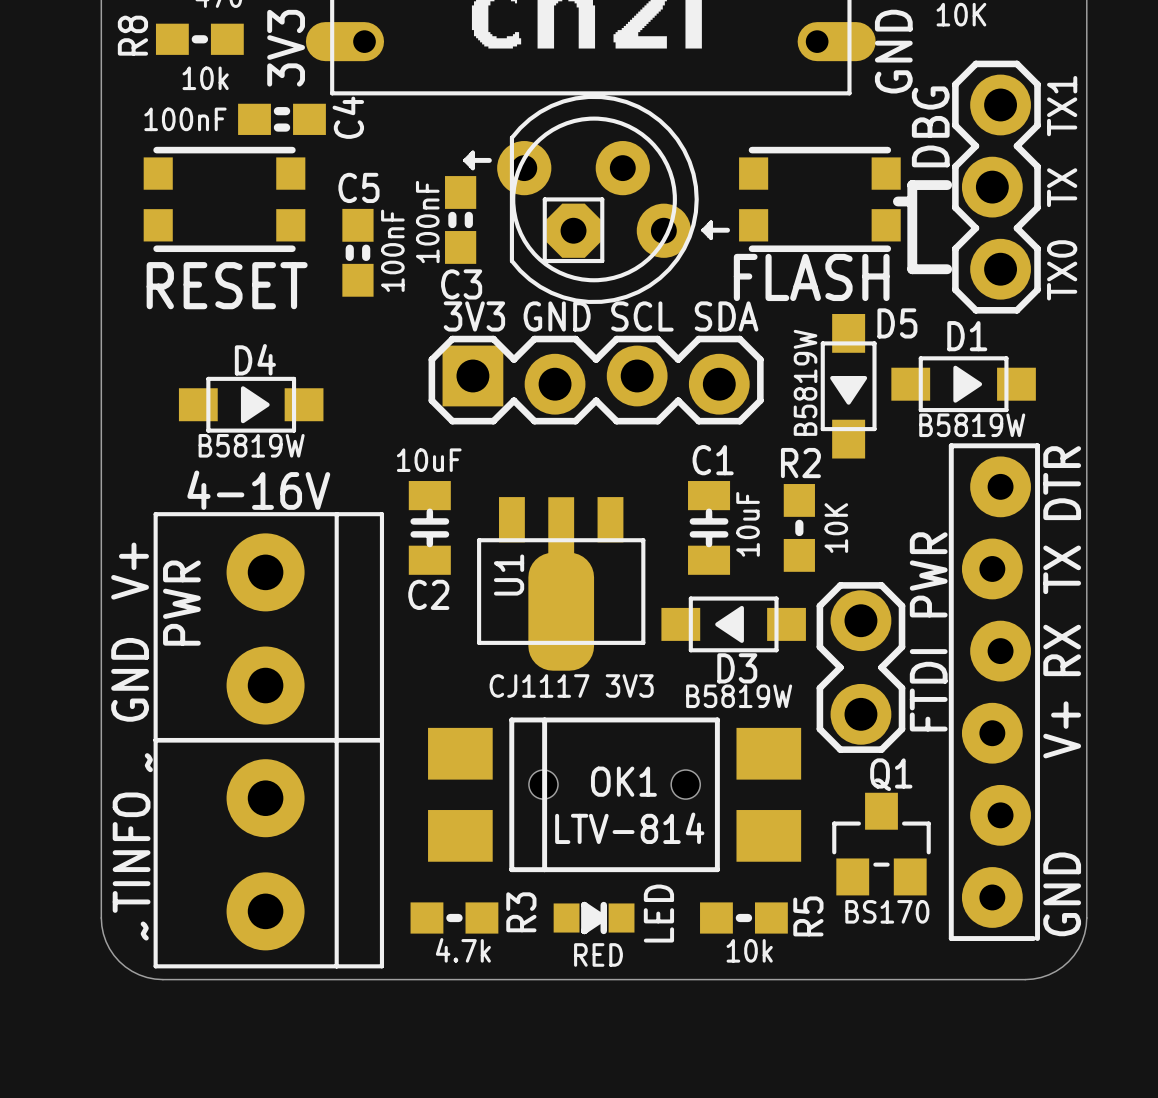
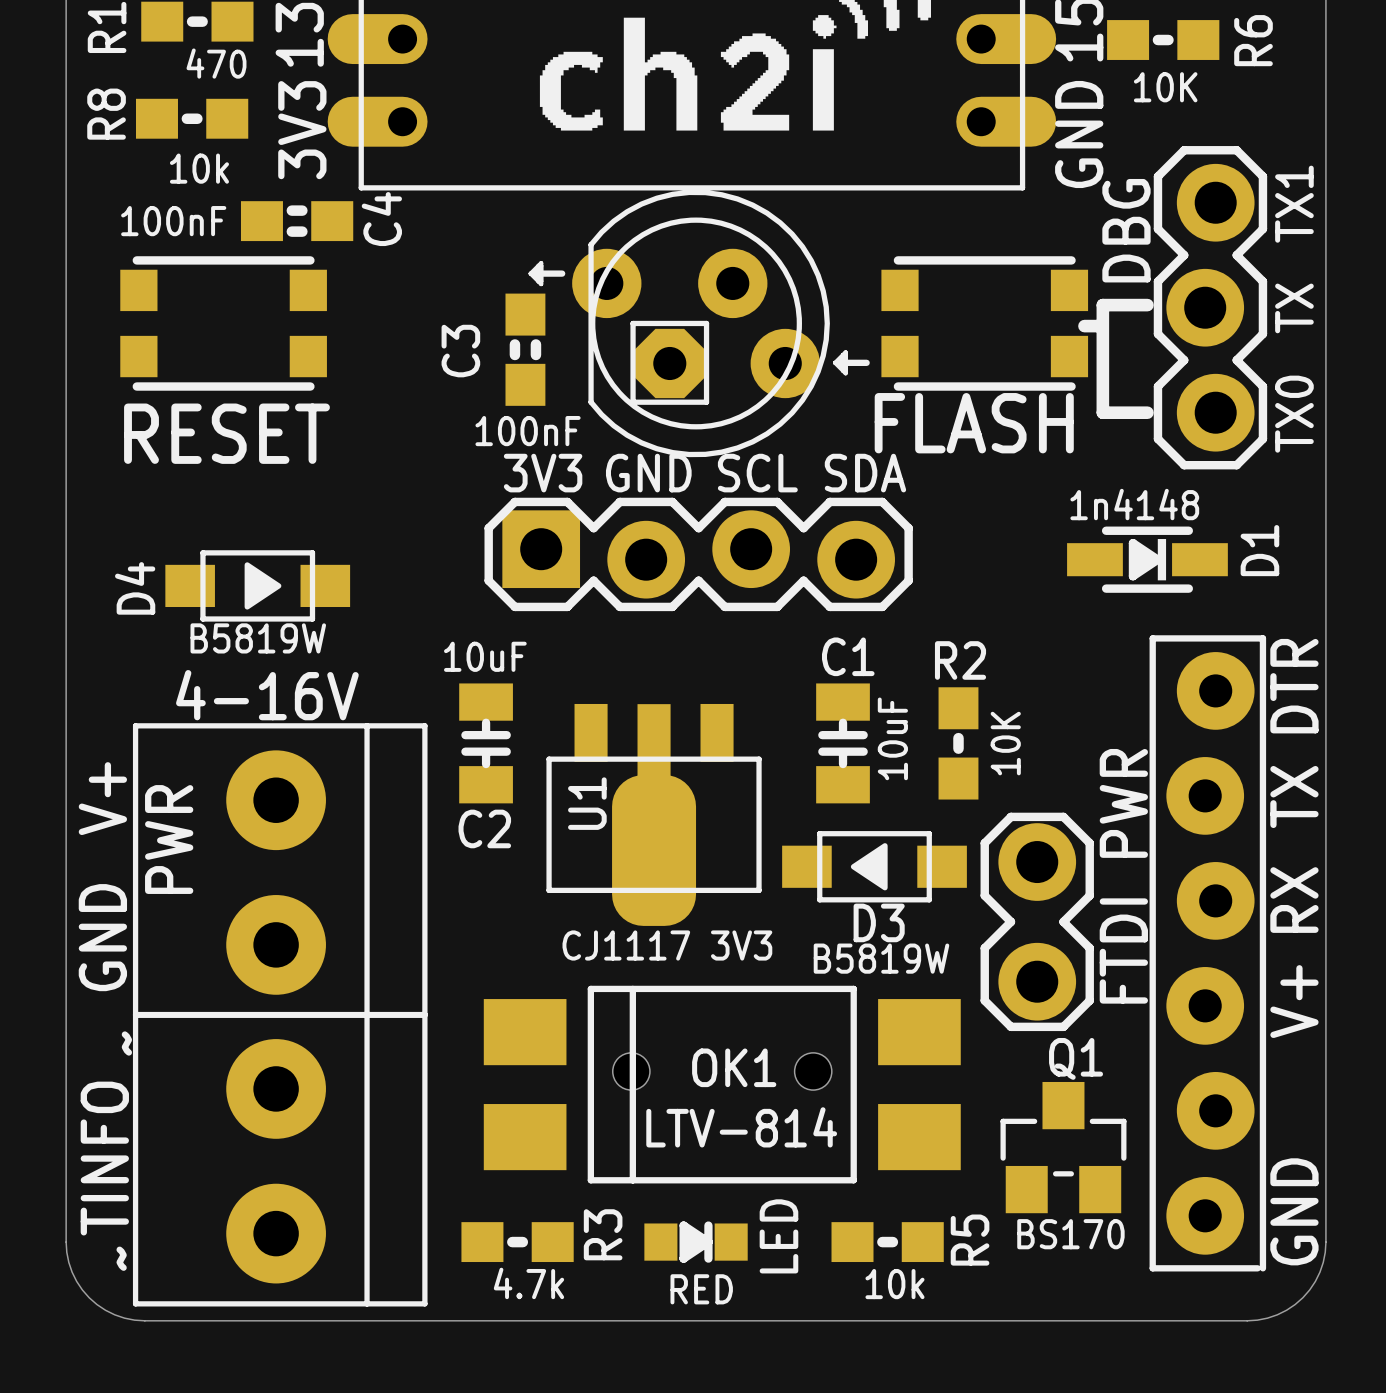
C3 value rotation: 0° (427, 222) -> 90° clockwise (528, 431)
C5: 100nF (357, 252) -> none
C3 name rotation: 0° (461, 284) -> 90° counterclockwise (460, 351)
C3 name position: C3 (461, 284) -> C3 (460, 351)
D1 name position: D1 (967, 336) -> D1 (1259, 550)
D1 footprint: [891, 356, 1036, 413] -> [1067, 526, 1228, 593]
D4 name rotation: 0° (255, 359) -> 90° counterclockwise (135, 588)
D4 name position: D4 (255, 359) -> D4 (135, 588)
D5: B5819W (848, 386) -> none
D1 value: B5819W (972, 425) -> 1n4148 (1134, 504)

